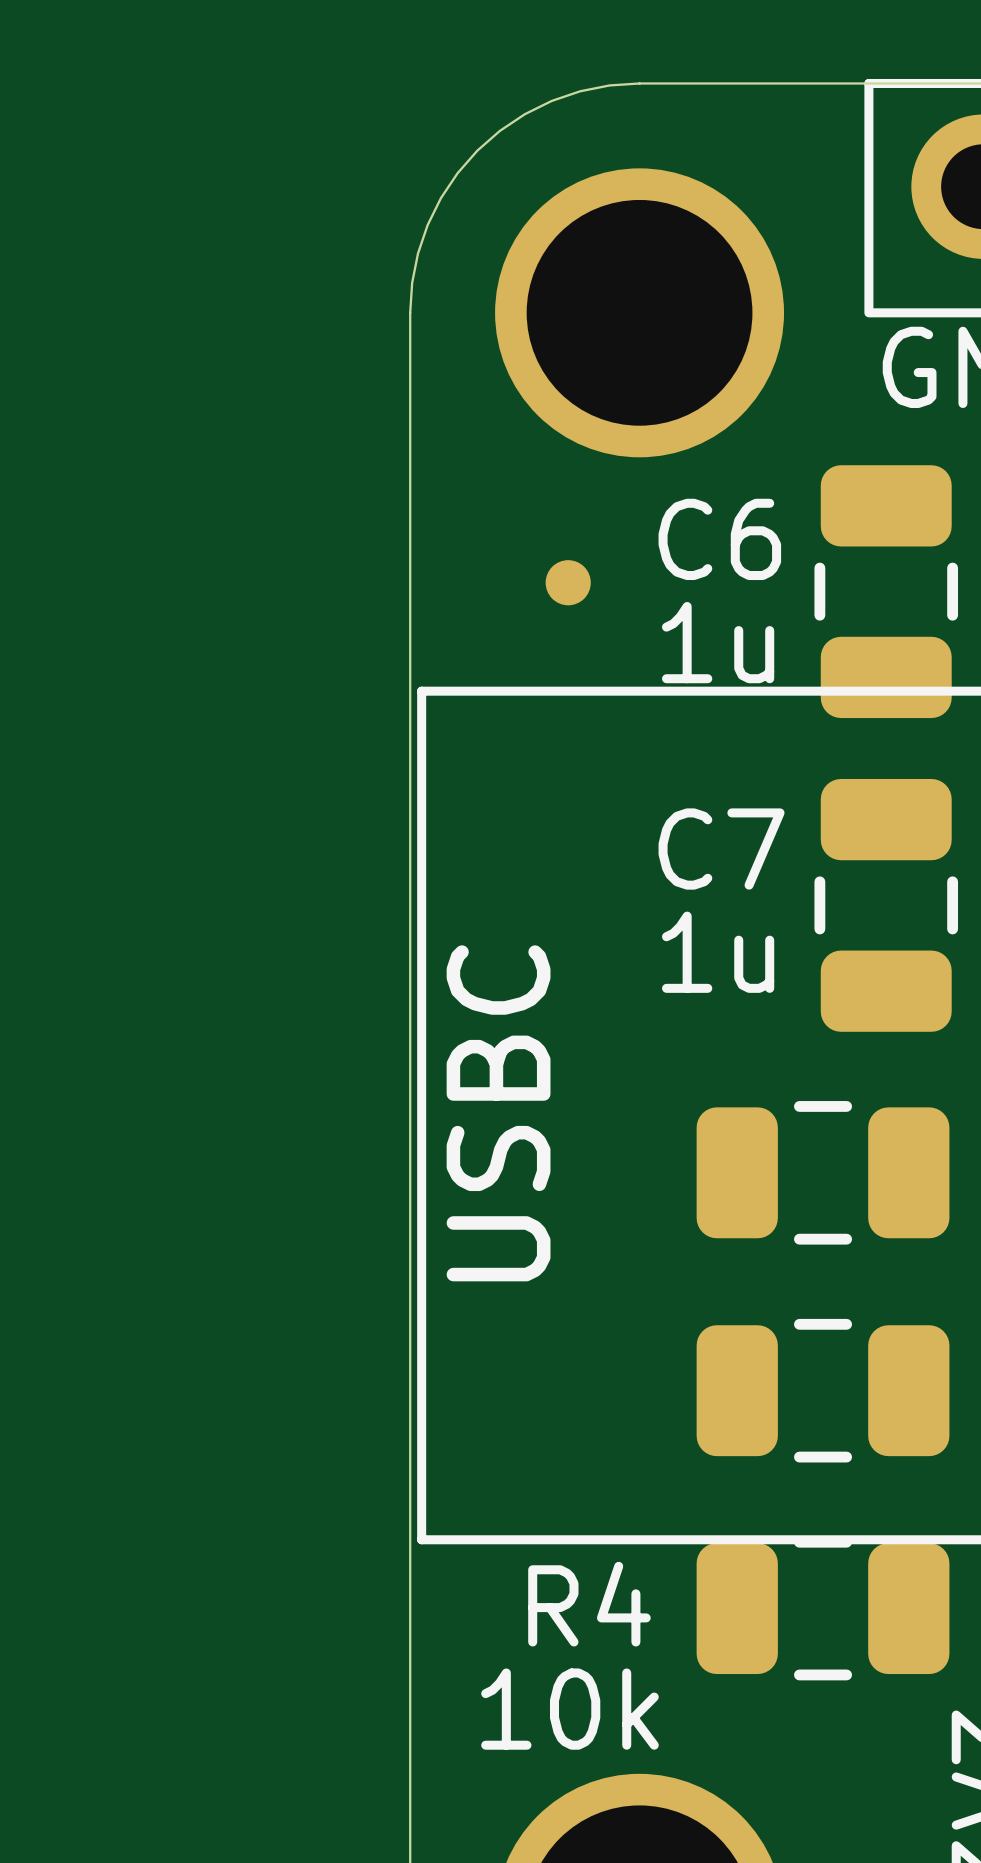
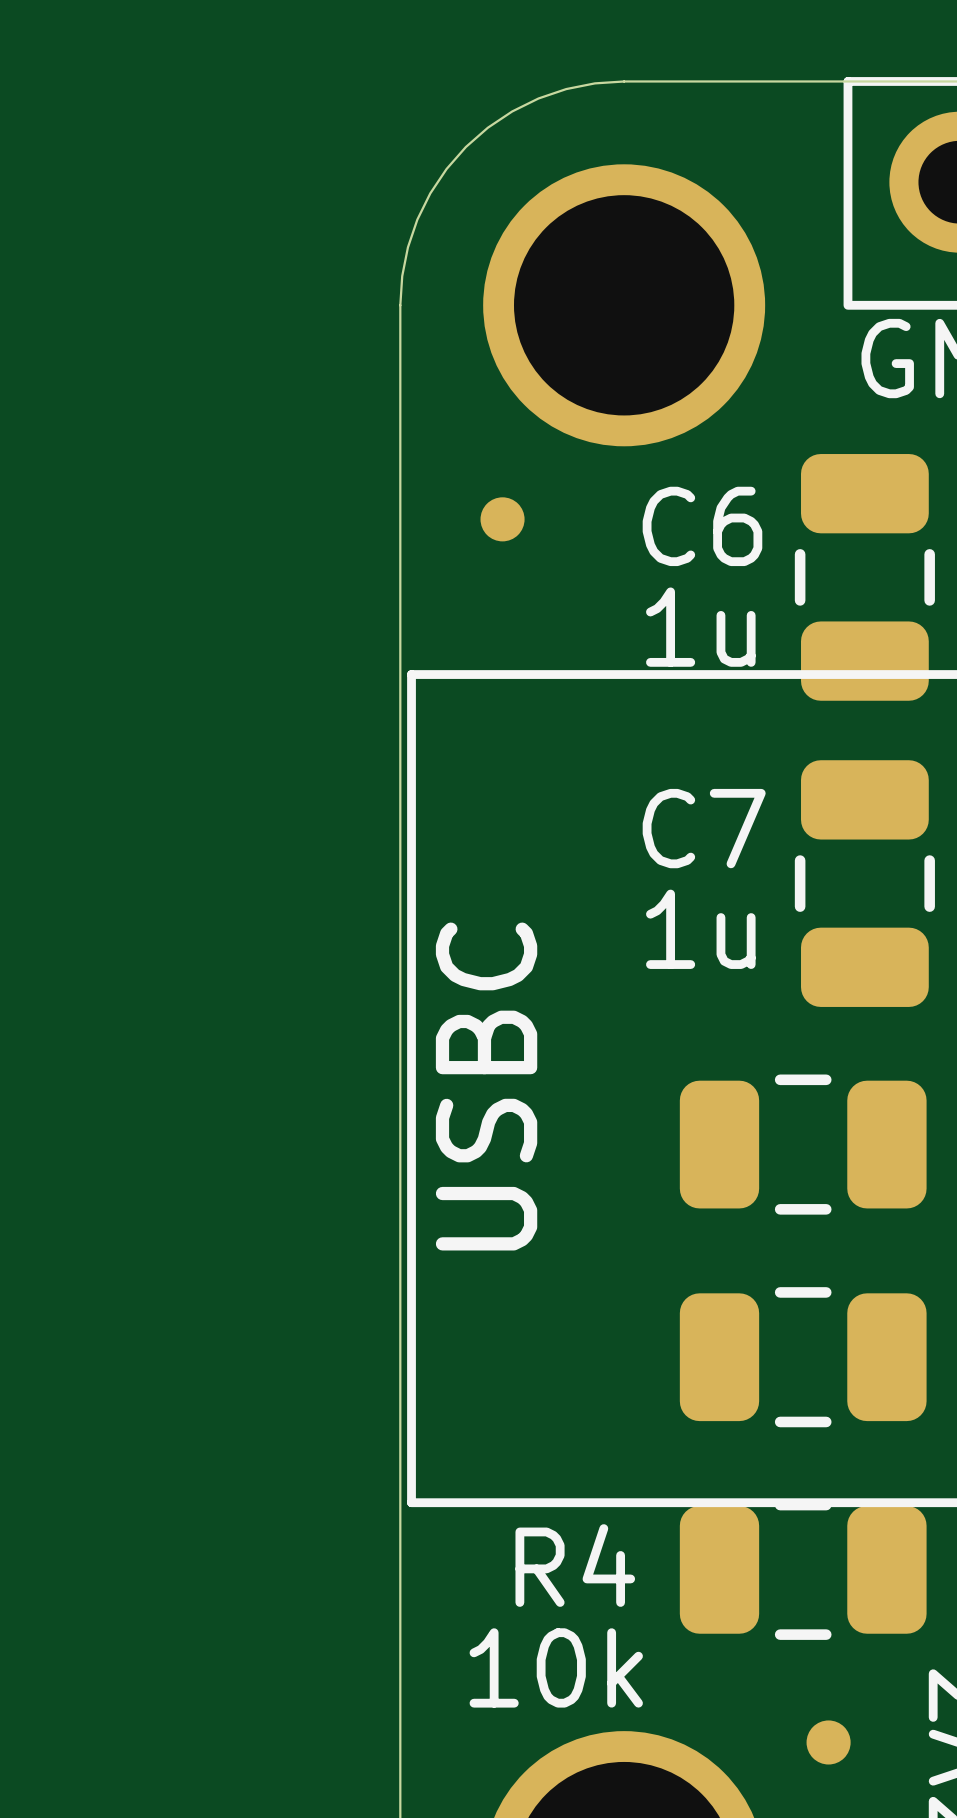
part position: (568, 582) -> (502, 519)
part: none -> (828, 1742)

